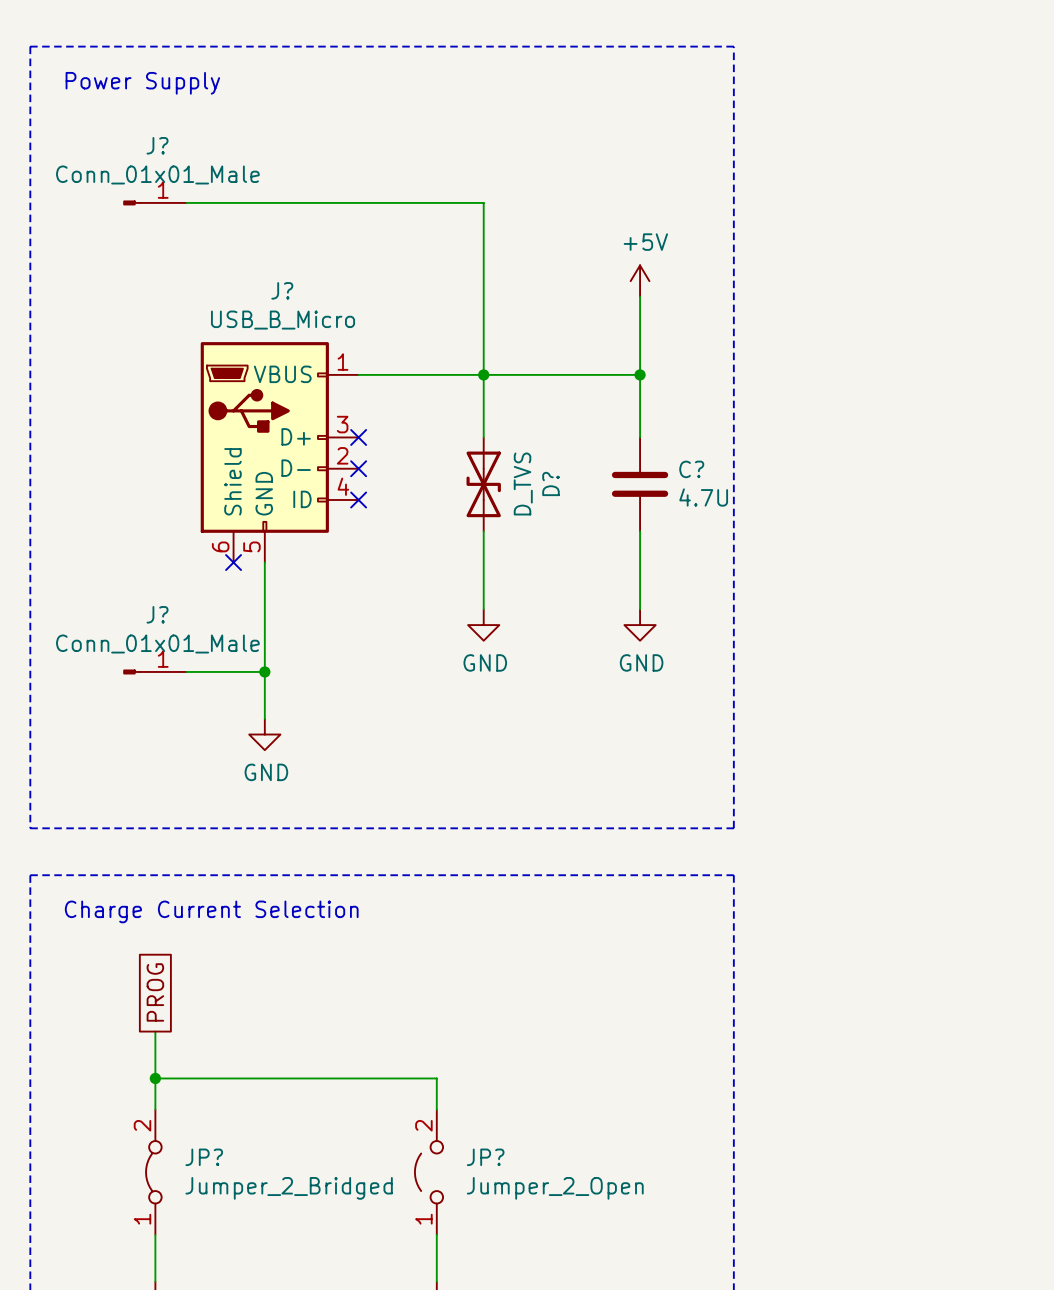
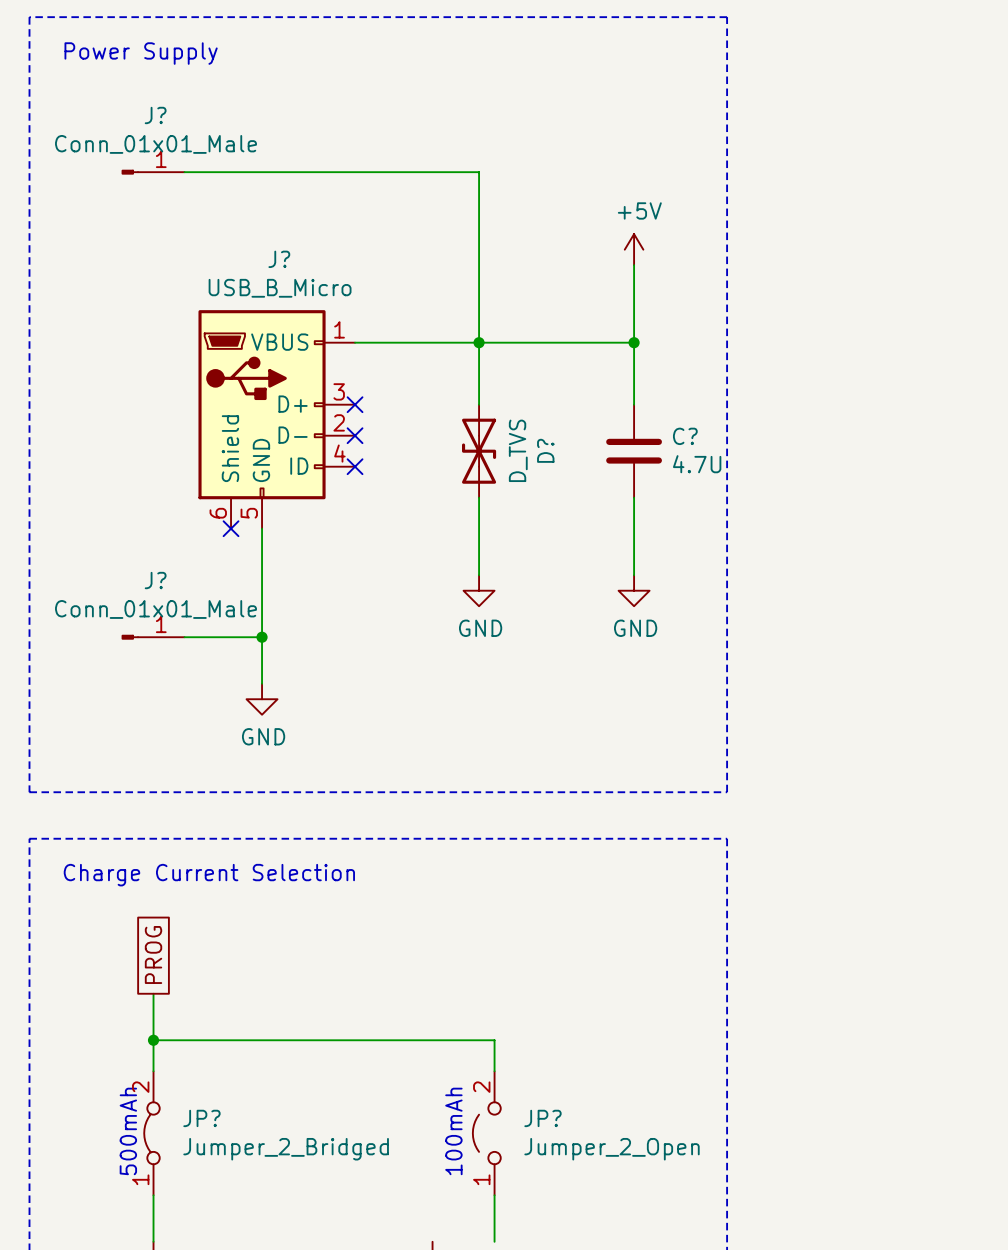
wire: (436, 1078) (436, 1109) -> (432, 1040) (494, 1040) (494, 1071)
text: none -> 500mAh (128, 1131)
text: none -> 100mAh (453, 1131)
JP? position: (428, 1172) -> (486, 1133)
wire: (436, 1234) (436, 1281) -> (494, 1195) (494, 1241)

